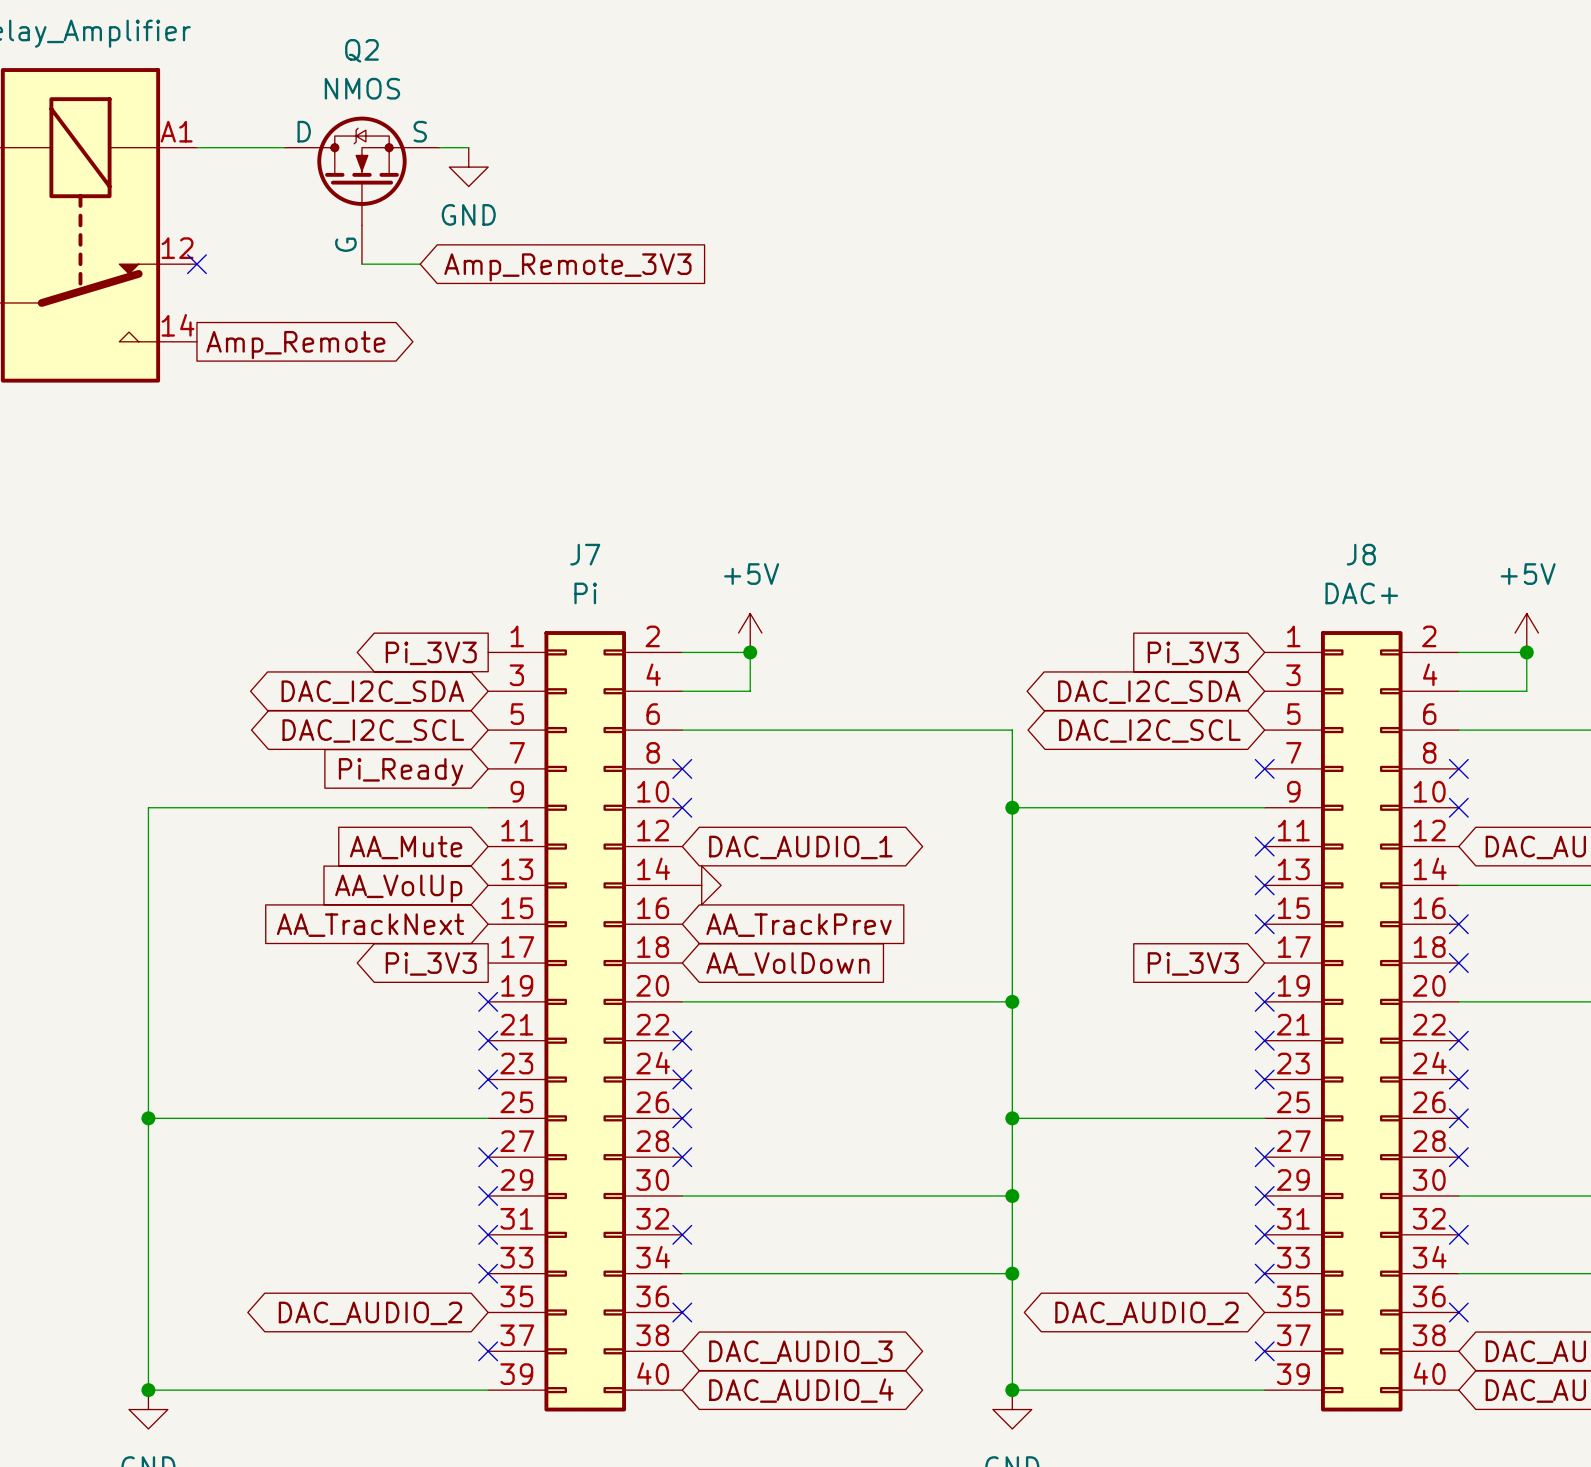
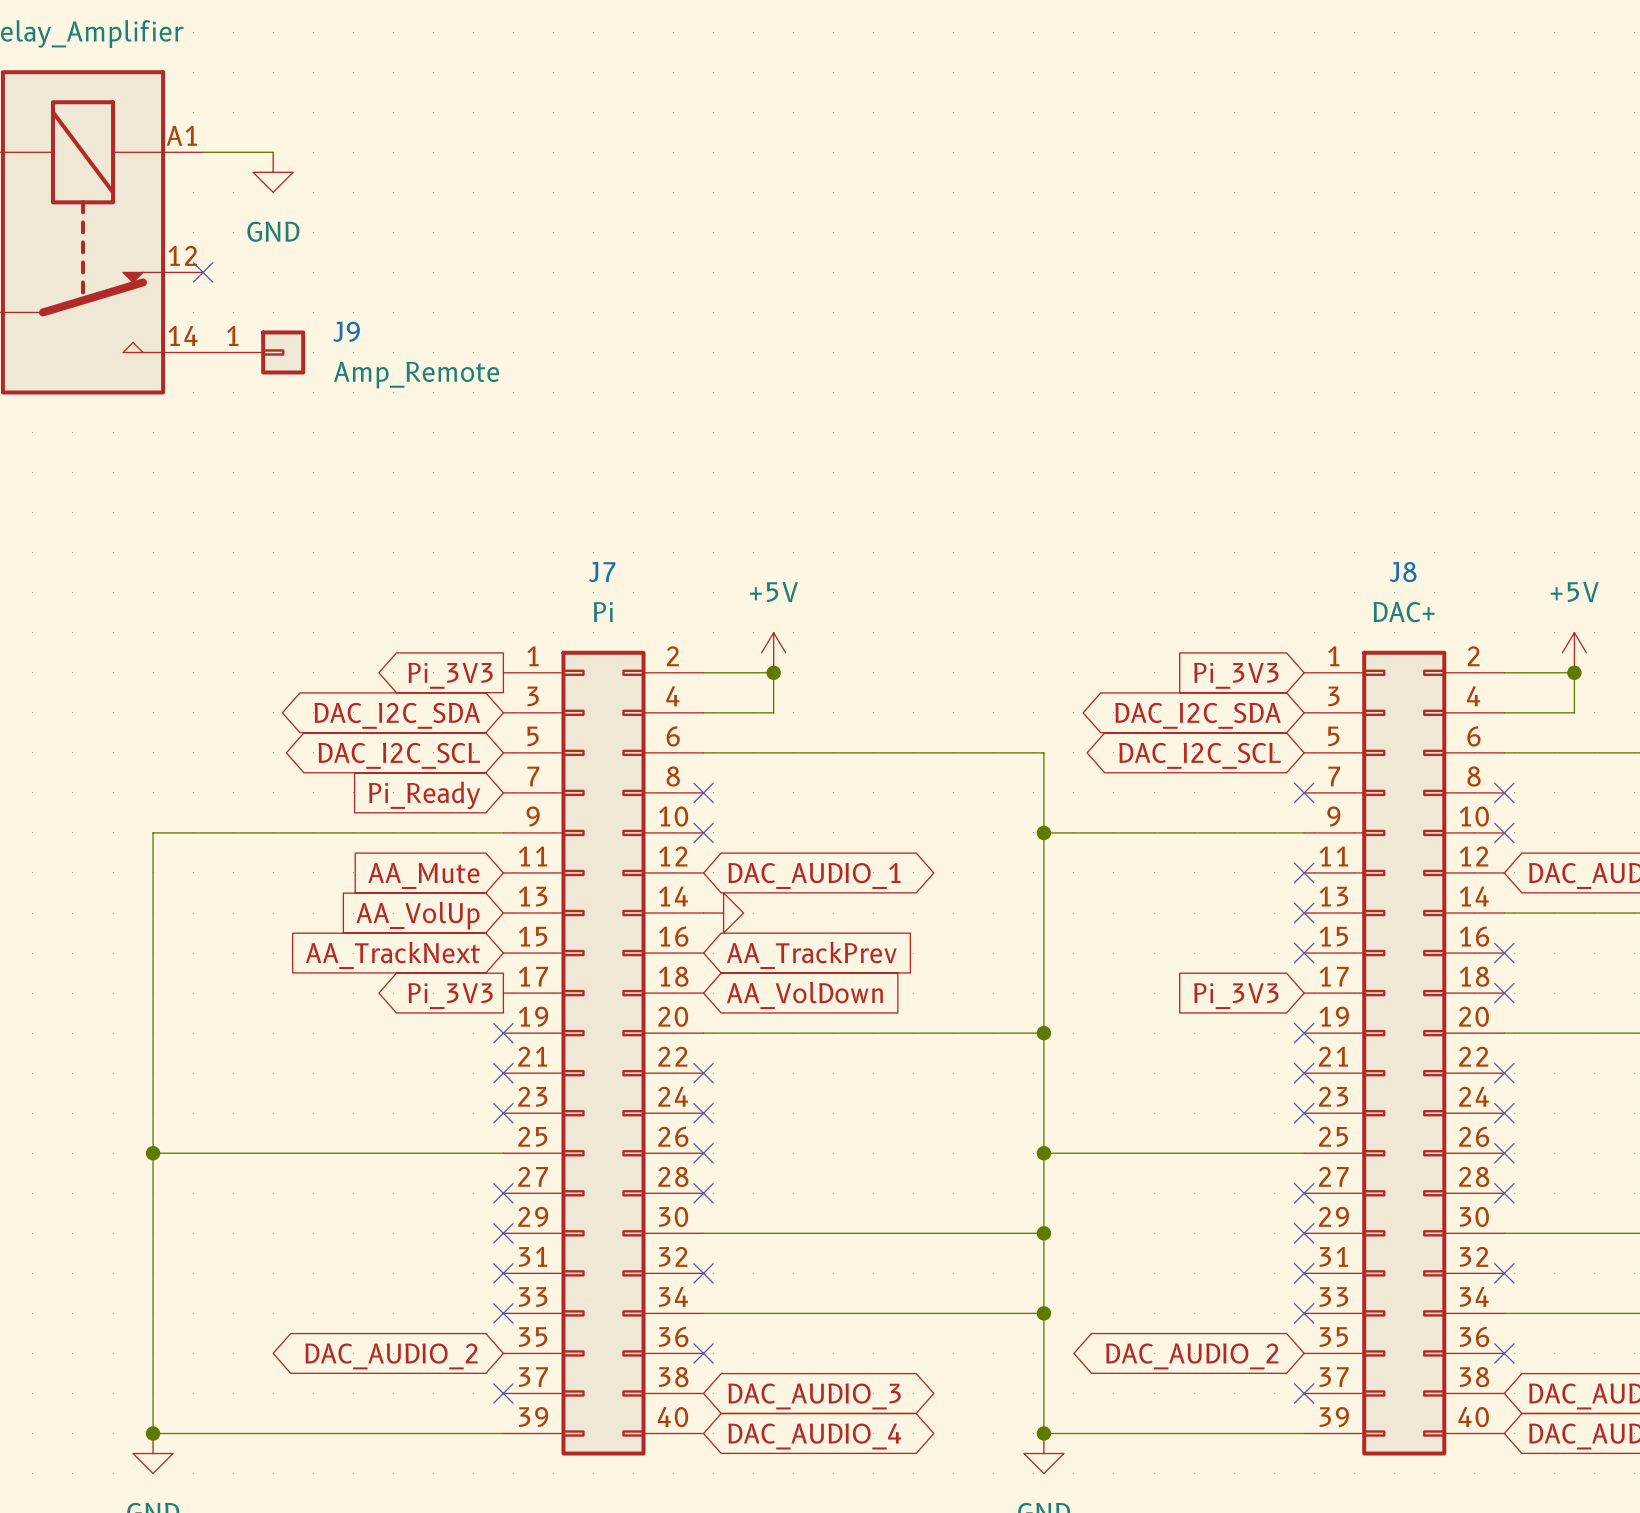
wire: (264, 147) (284, 147) -> none
wire: (439, 147) (468, 147) -> none
power symbol position: GND (468, 167) -> GND (273, 172)
Q2: NMOS (361, 190) -> none
power symbol text position: GND (468, 214) -> GND (273, 231)
wire: (361, 264) (420, 264) -> none
global label: Amp_Remote_3V3 (567, 267) -> none
J9: none -> Amp_Remote (254, 352)
global label: Amp_Remote (295, 345) -> none

